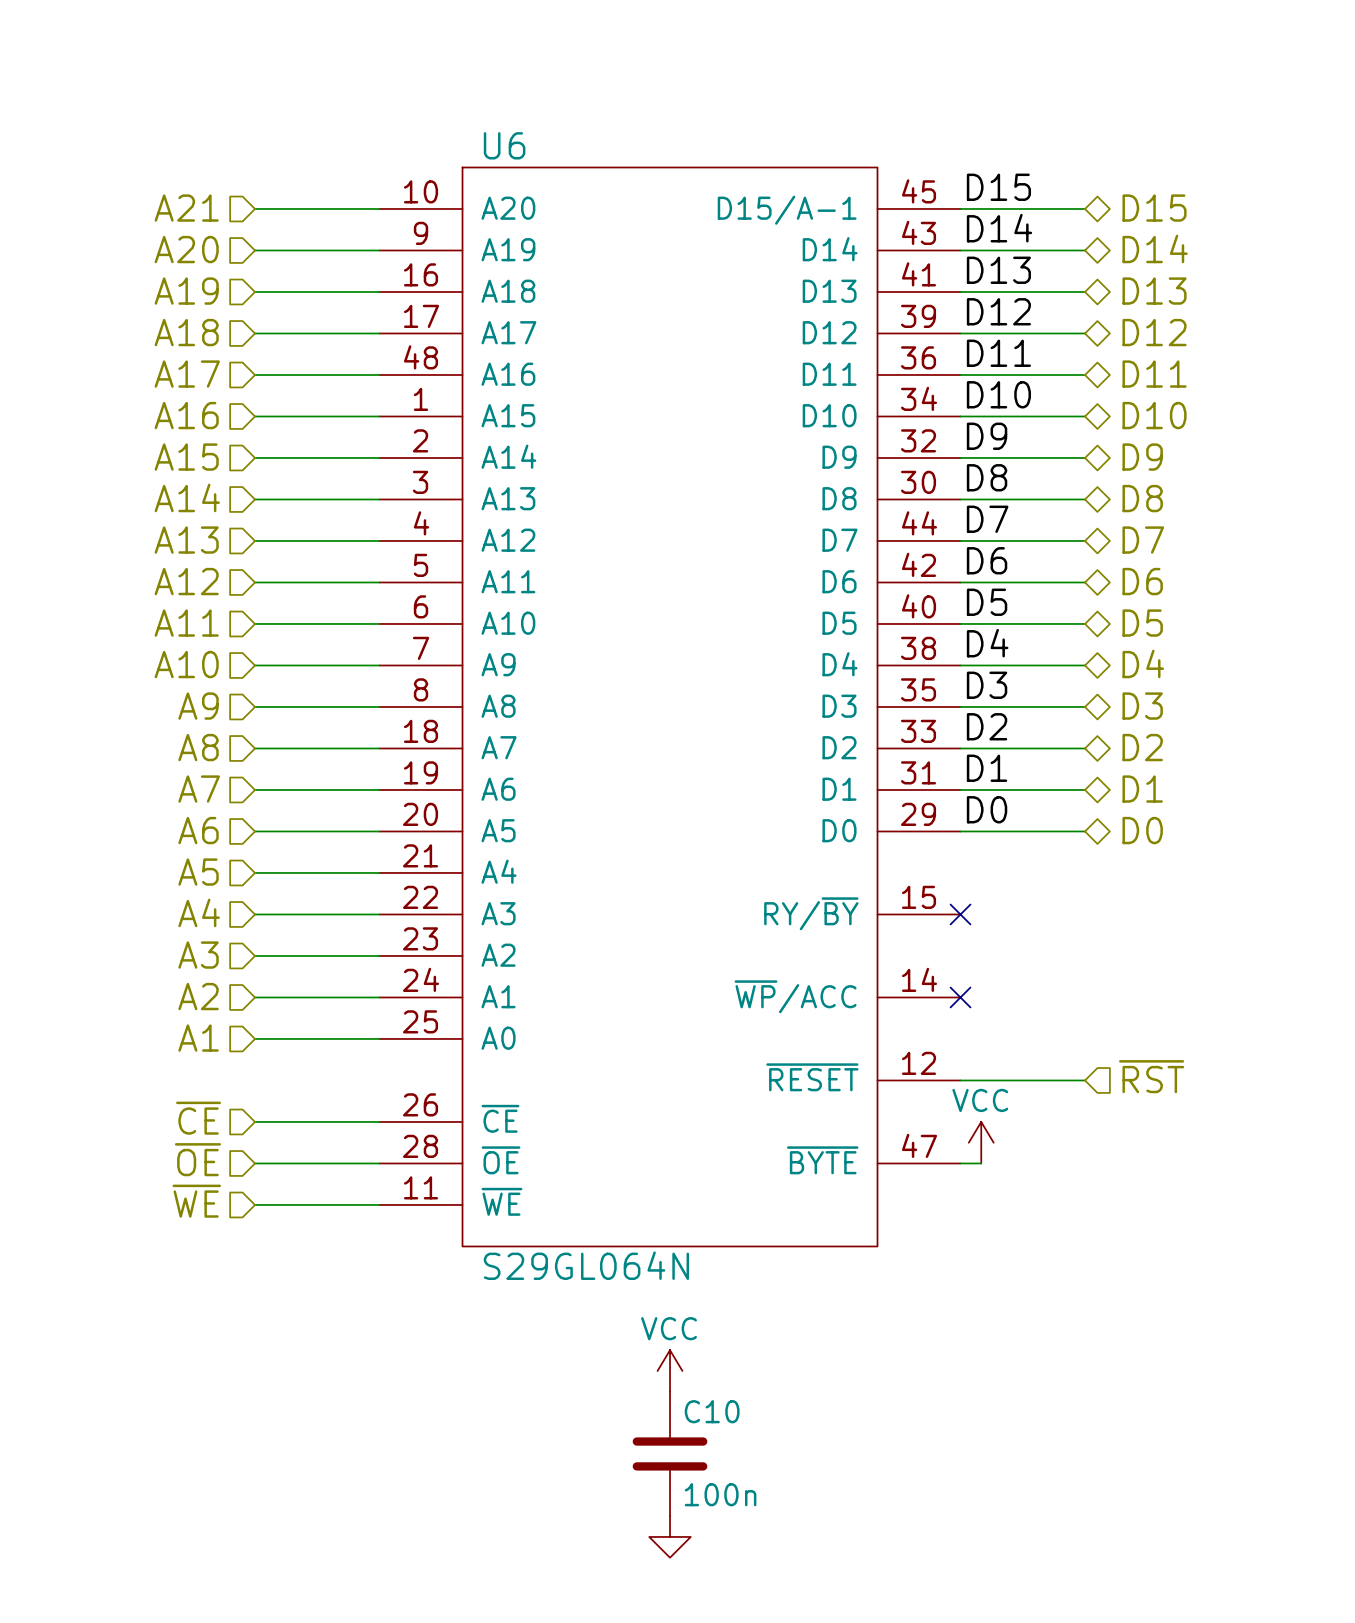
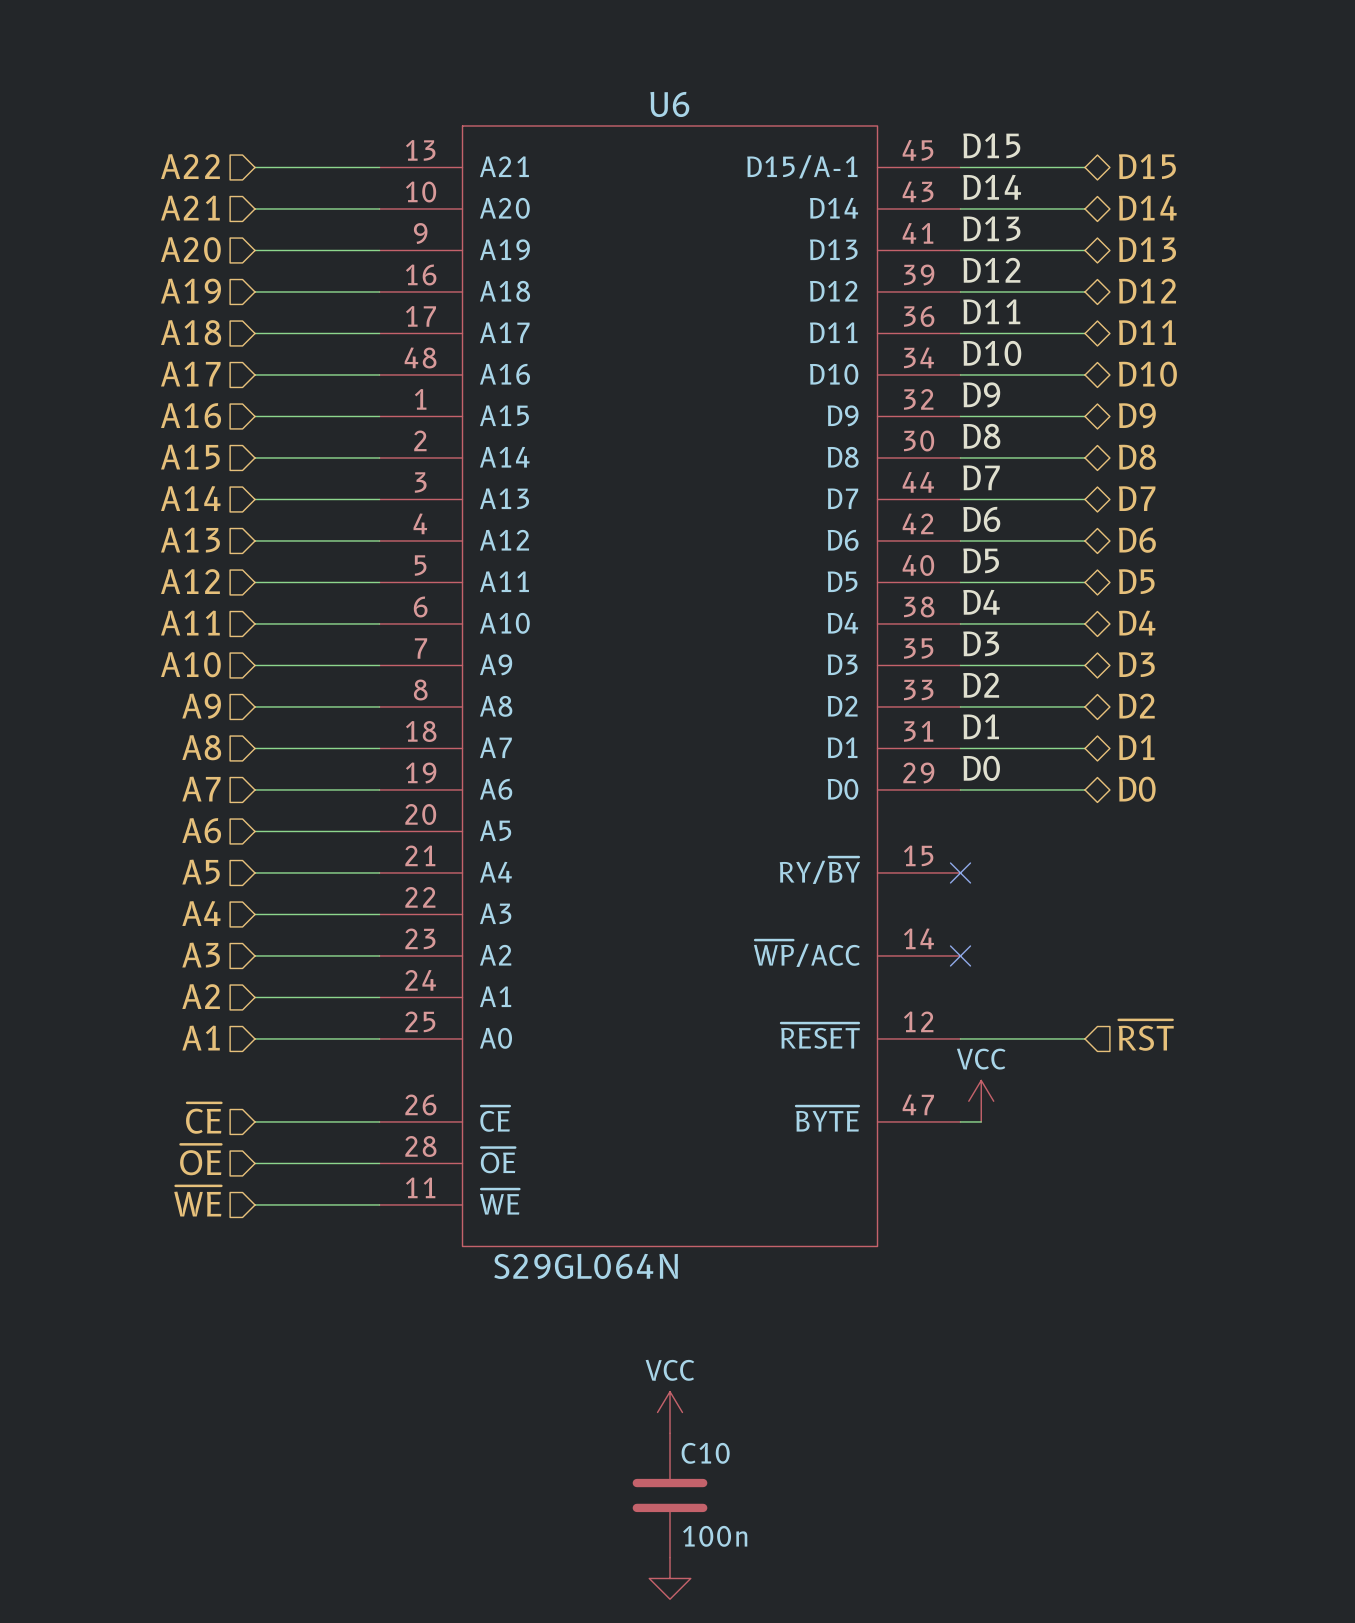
U6 name position: U6 (504, 145) -> U6 (669, 104)
label: none -> D15 (991, 145)
hierarchical label: none -> A22 (190, 166)
hierarchical label: none -> D15 (1147, 166)
wire: none -> (255, 167) (379, 167)
U6 symbol: [379, 167, 961, 1247] -> [379, 125, 961, 1247]
wire: none -> (960, 167) (1085, 167)
label: D15 (998, 187) -> D14 (992, 187)
hierarchical label: D15 (1154, 208) -> D14 (1147, 208)
label: D14 (999, 228) -> D13 (991, 228)
hierarchical label: D14 (1155, 248) -> D13 (1147, 249)
label: D13 (998, 270) -> D12 (991, 270)
hierarchical label: D13 (1154, 291) -> D12 (1147, 291)
label: D12 (998, 311) -> D11 (991, 311)
hierarchical label: D12 (1154, 332) -> D11 (1147, 332)
label: D11 (998, 353) -> D10 (992, 353)
hierarchical label: D11 (1154, 374) -> D10 (1147, 374)
label: D10 (998, 394) -> D9 (981, 394)
hierarchical label: D10 (1154, 415) -> D9 (1137, 415)
label: D9 (987, 436) -> D8 (981, 436)
hierarchical label: D9 (1142, 457) -> D8 (1137, 457)
label: D8 (987, 477) -> D7 (981, 477)
hierarchical label: D8 (1142, 498) -> D7 (1137, 498)
label: D7 (987, 519) -> D6 (981, 519)
hierarchical label: D7 (1143, 540) -> D6 (1137, 540)
label: D6 (987, 560) -> D5 (981, 560)
hierarchical label: D6 (1142, 581) -> D5 (1136, 581)
label: D5 (987, 602) -> D4 (981, 602)
hierarchical label: D5 (1142, 623) -> D4 (1137, 623)
label: D4 (987, 643) -> D3 (981, 643)
hierarchical label: D4 (1143, 663) -> D3 (1136, 664)
label: D3 (987, 685) -> D2 (981, 685)
hierarchical label: D3 (1142, 706) -> D2 (1136, 706)
label: D2 (987, 726) -> D1 (981, 726)
hierarchical label: D2 (1142, 747) -> D1 (1136, 747)
label: D1 (987, 768) -> D0 (981, 768)
hierarchical label: D1 (1142, 789) -> D0 (1137, 789)
label: D0 (987, 809) -> none
hierarchical label: D0 (1142, 830) -> none
wire: (960, 831) (1085, 831) -> none
no-connect mark: none -> (960, 872)
no-connect mark: (960, 914) -> none
no-connect mark: none -> (960, 955)
no-connect mark: (960, 997) -> none
hierarchical label position: ~{RST} (1151, 1076) -> ~{RST} (1146, 1035)
wire: (960, 1080) (1085, 1080) -> (960, 1038) (1085, 1038)
power symbol position: VCC (981, 1142) -> VCC (981, 1101)
wire: (960, 1163) (981, 1163) -> (960, 1121) (981, 1121)
power symbol position: VCC (670, 1370) -> VCC (670, 1412)
C10 position: (670, 1453) -> (670, 1495)
power symbol position: (670, 1536) -> (670, 1578)

